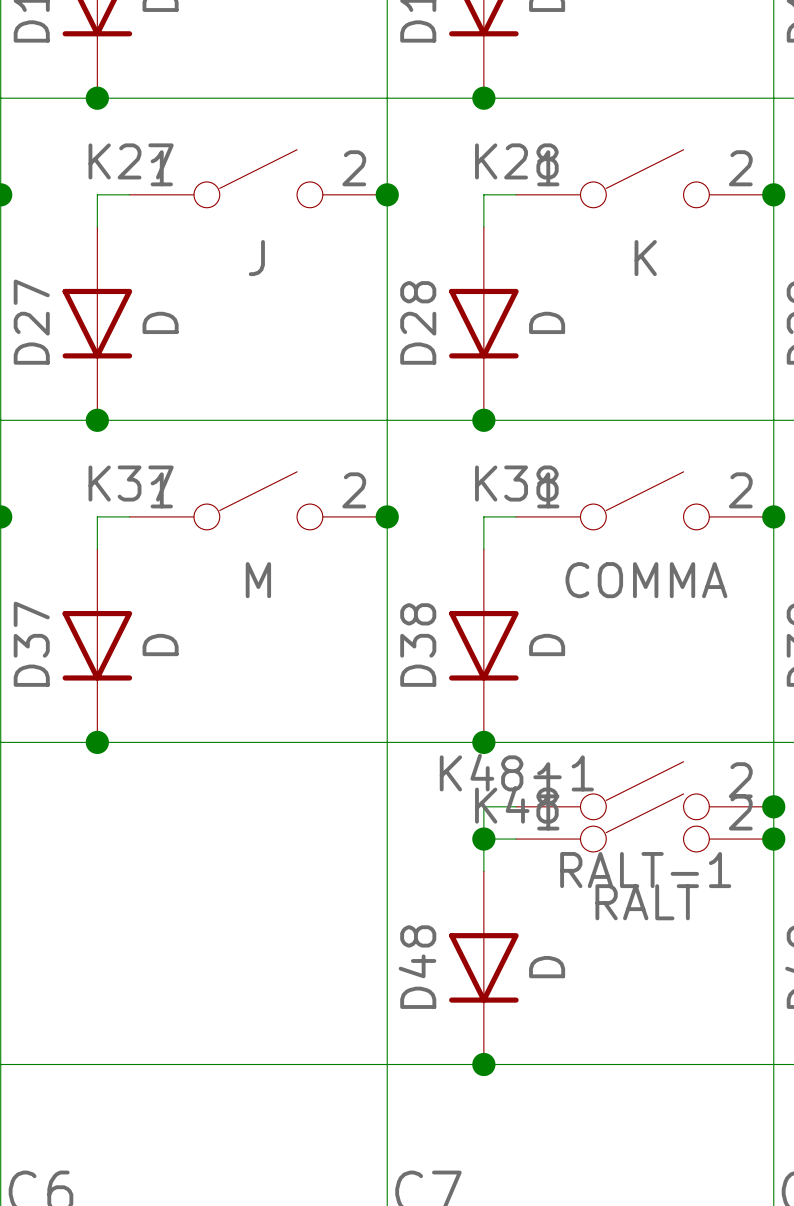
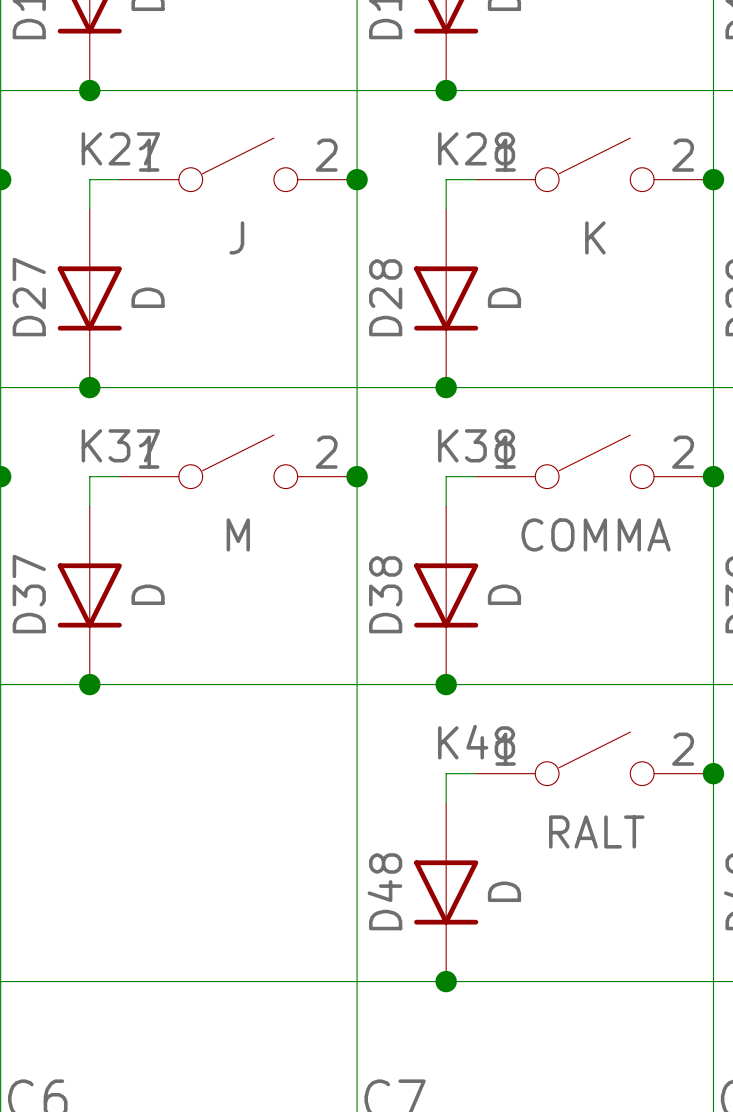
K48-1: RALT-1 (644, 790) -> none
wire: (516, 806) (483, 806) (483, 839) -> none
junction: (773, 806) -> none
junction: (483, 839) -> none

